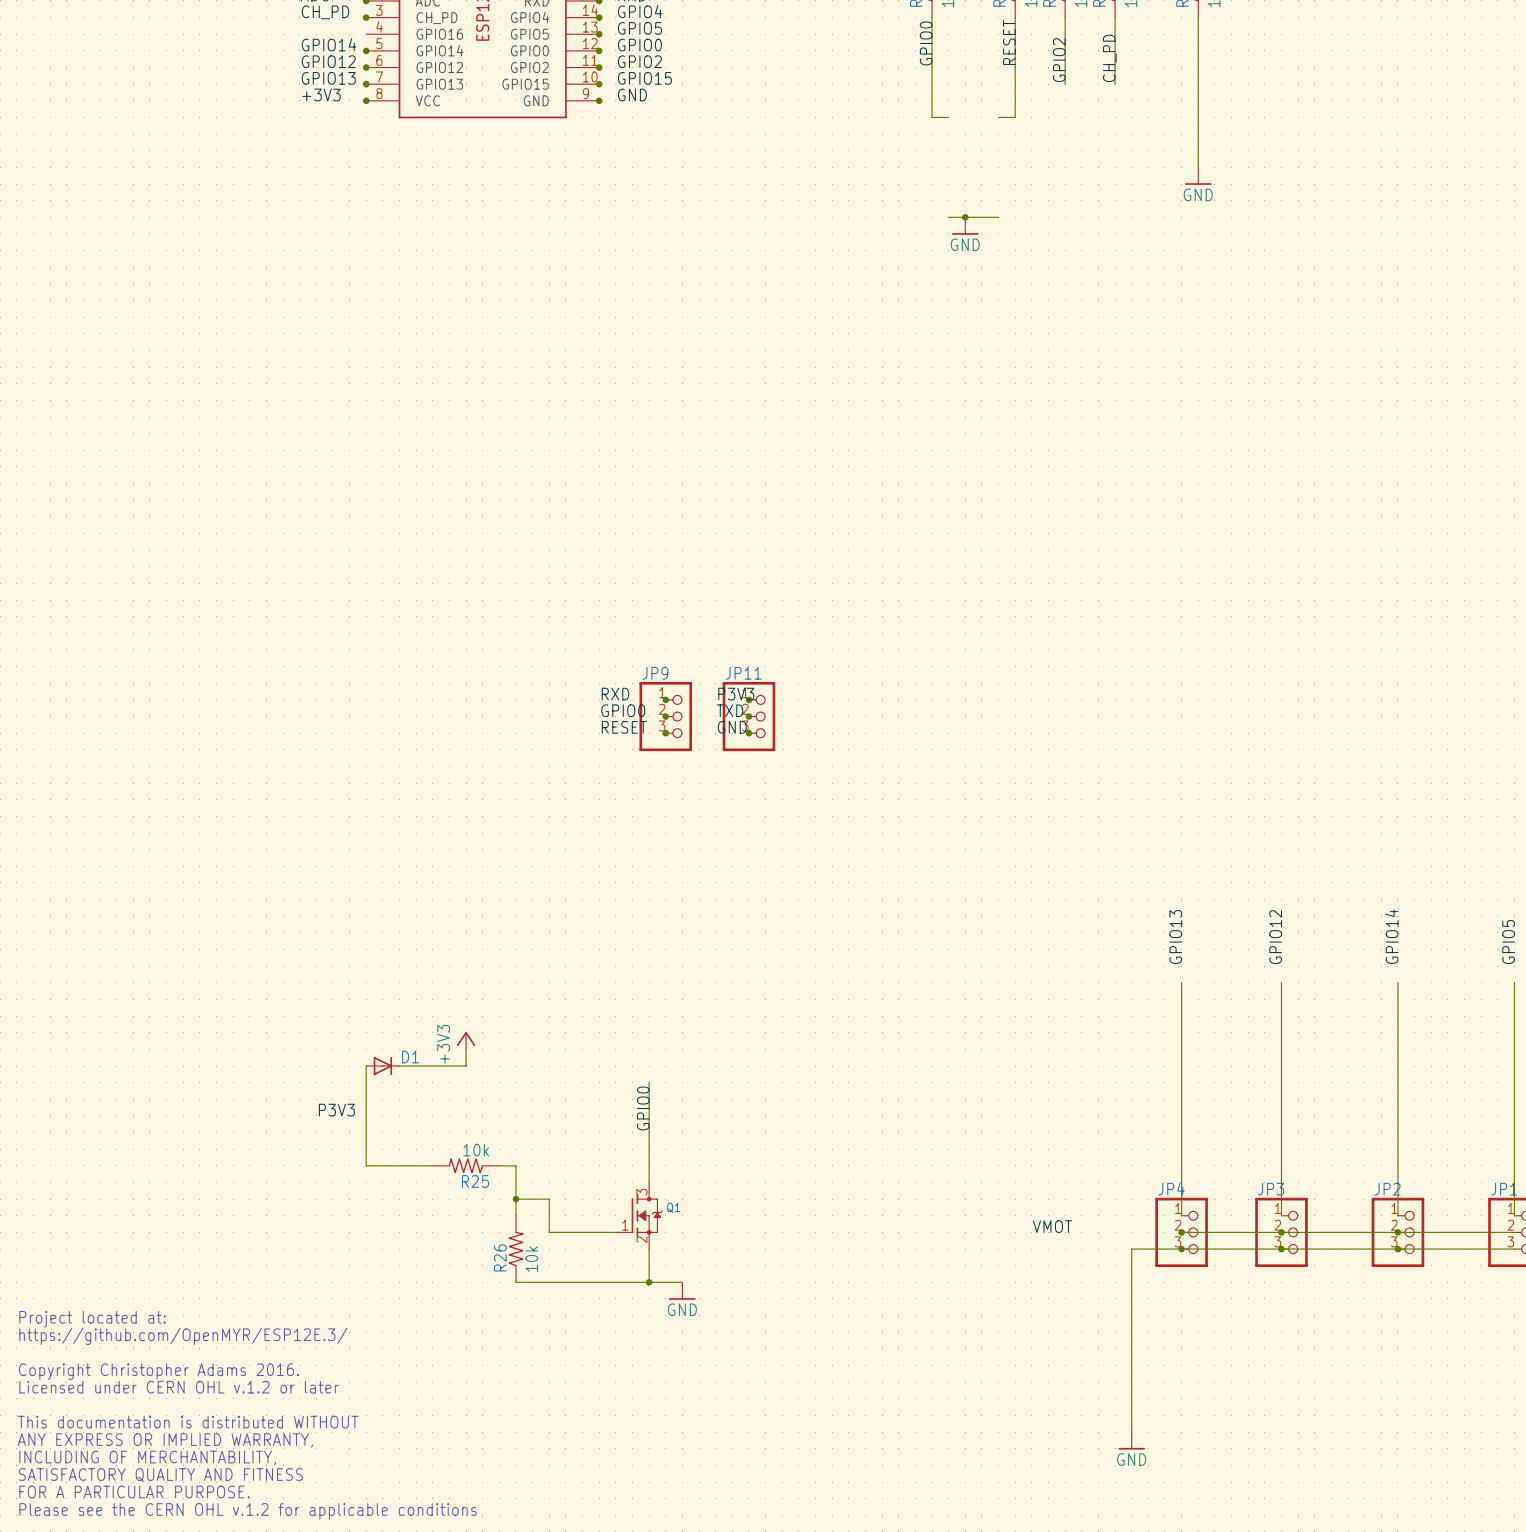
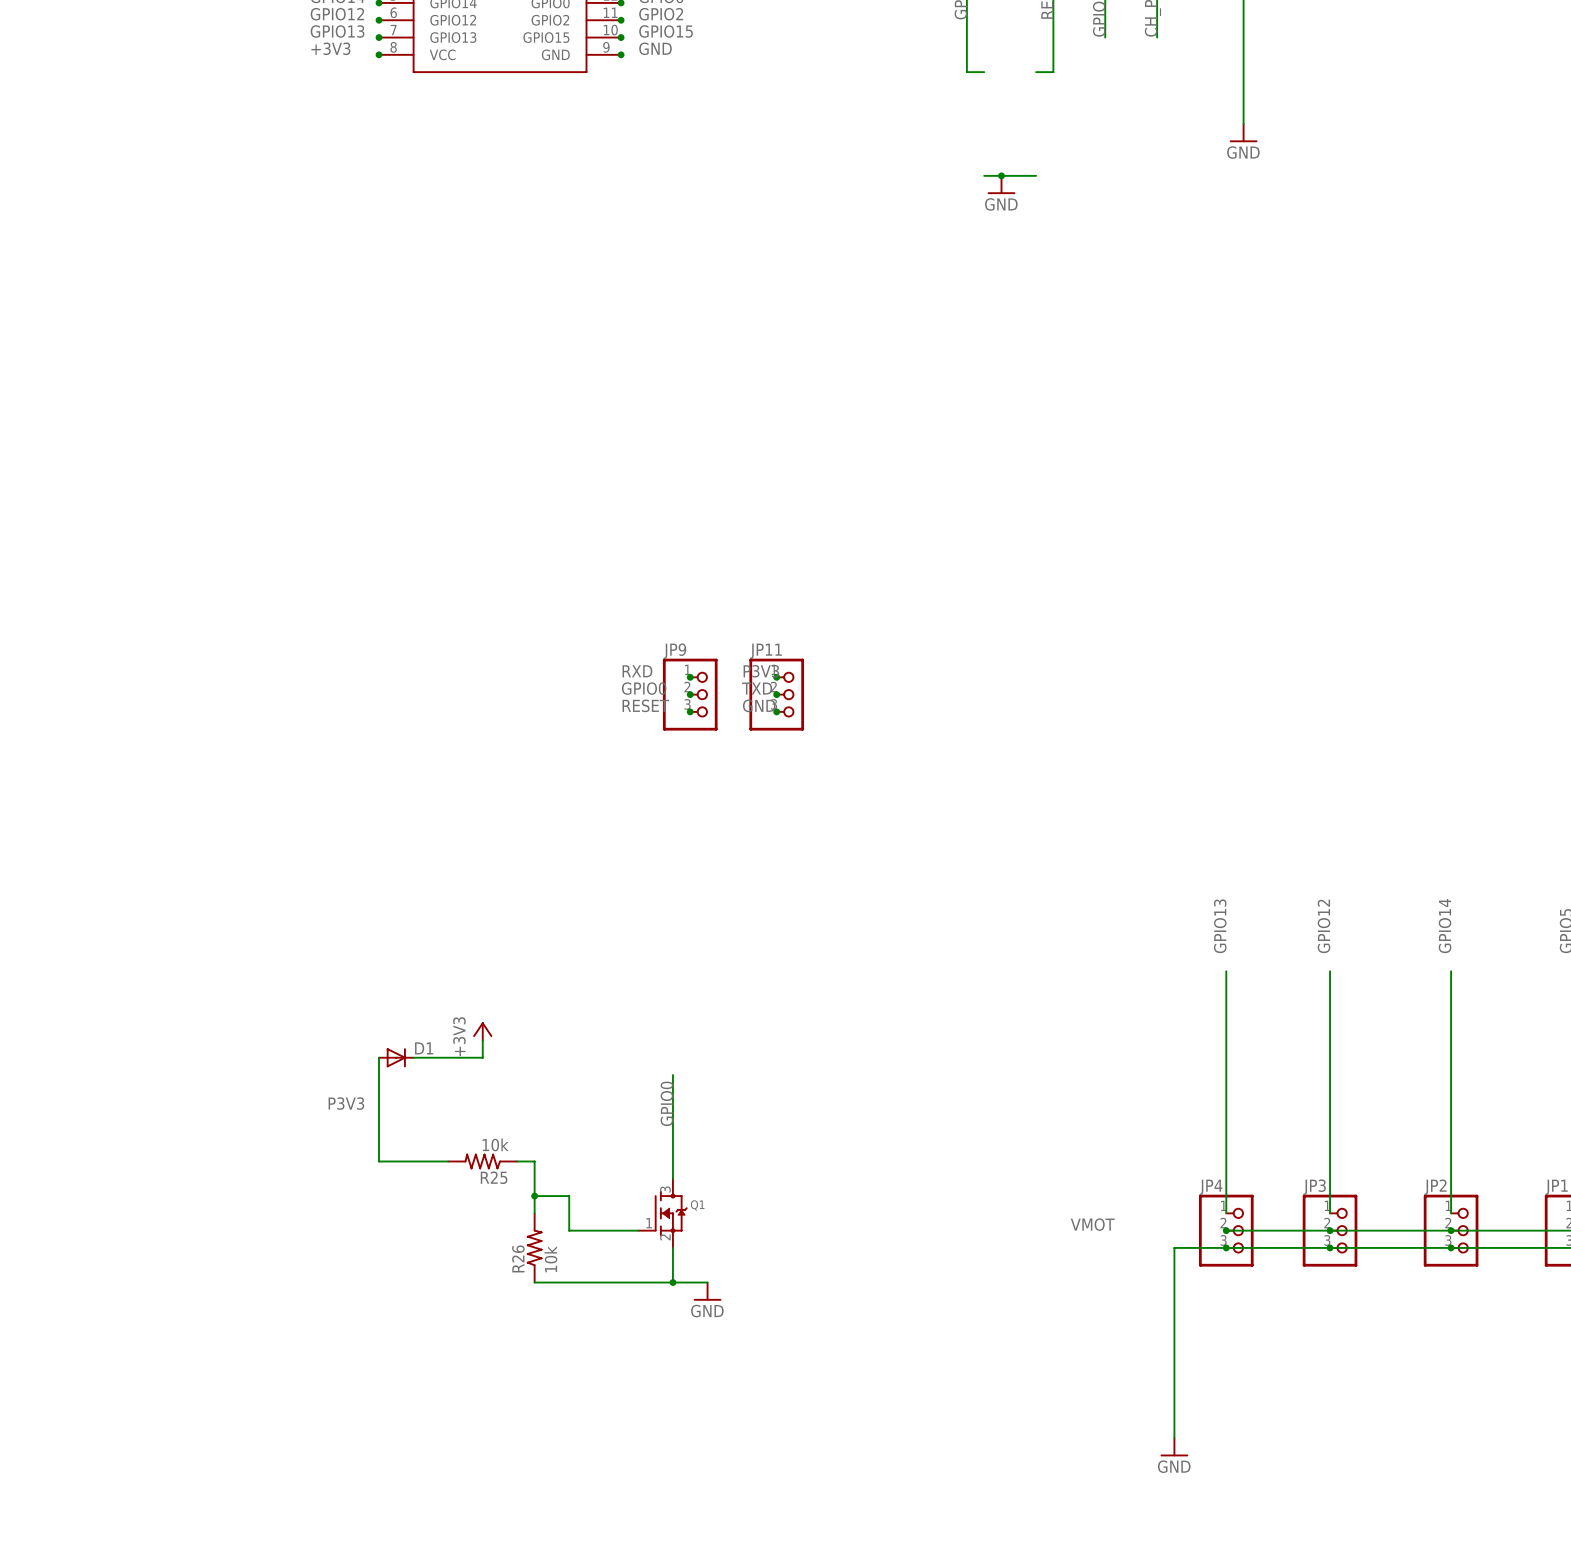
text: Project located at: (92, 1319) -> none
text: https://github.com/OpenMYR/ESP12E.3/ (183, 1336) -> none
text: Copyright Christopher Adams 2016. (158, 1371) -> none
text: Licensed under CERN OHL v.1.2 or later (179, 1387) -> none
text: This documentation is distributed WITHOUT (188, 1422) -> none
text: ANY EXPRESS OR IMPLIED WARRANTY, (165, 1440) -> none
text: INCLUDING OF MERCHANTABILITY, (147, 1457) -> none
text: SATISFACTORY QUALITY AND FITNESS (160, 1475) -> none
text: FOR A PARTICULAR PURPOSE. (134, 1492) -> none
text: Please see the CERN OHL v.1.2 for applicable conditions (248, 1511) -> none

